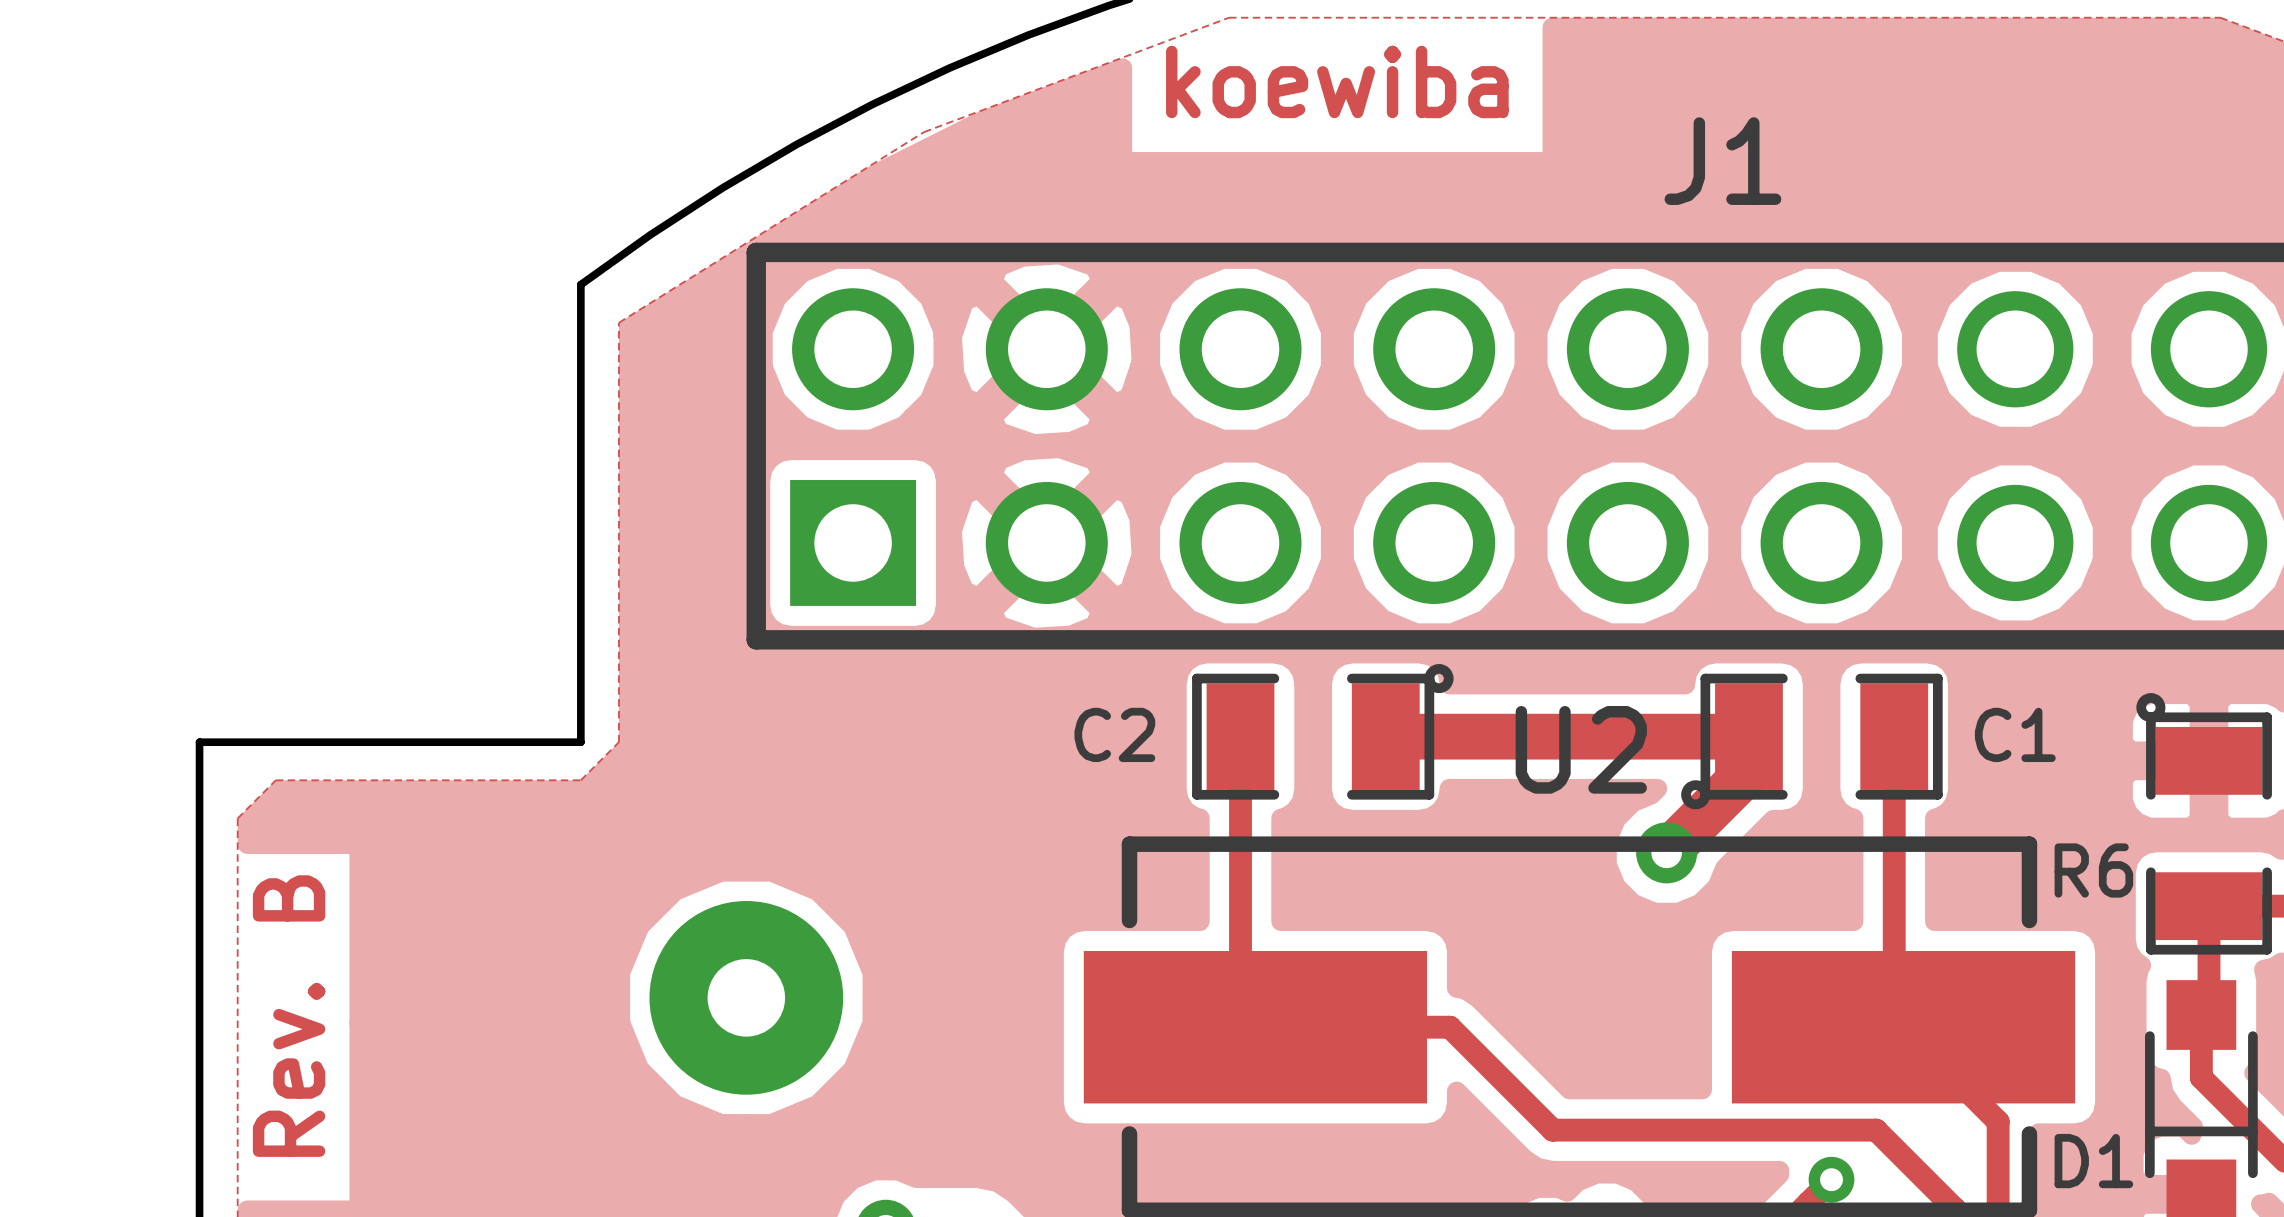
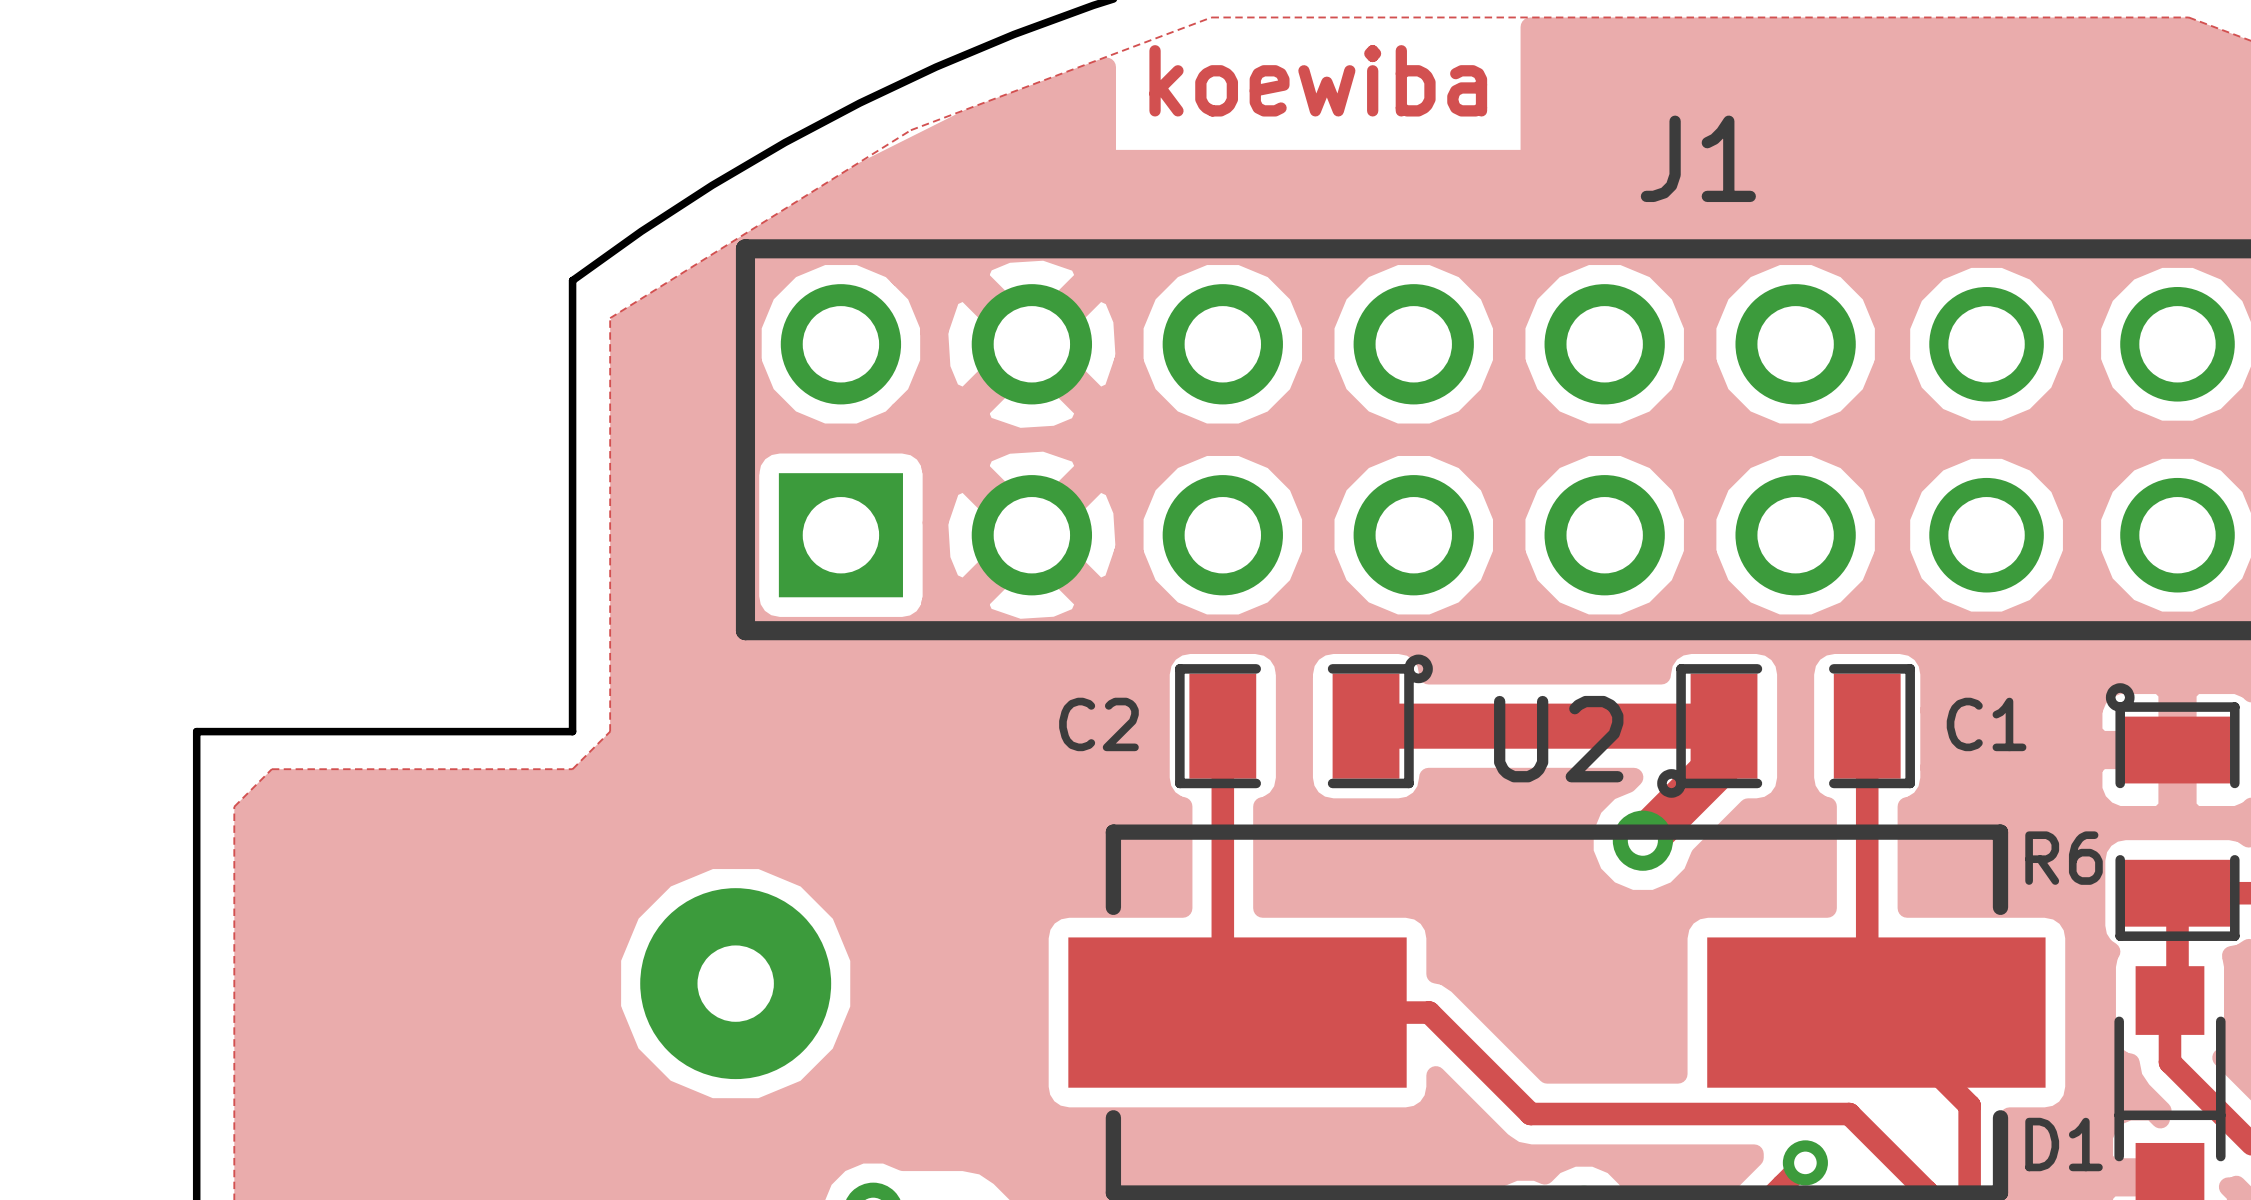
text: Rev. B (289, 1016) -> none

